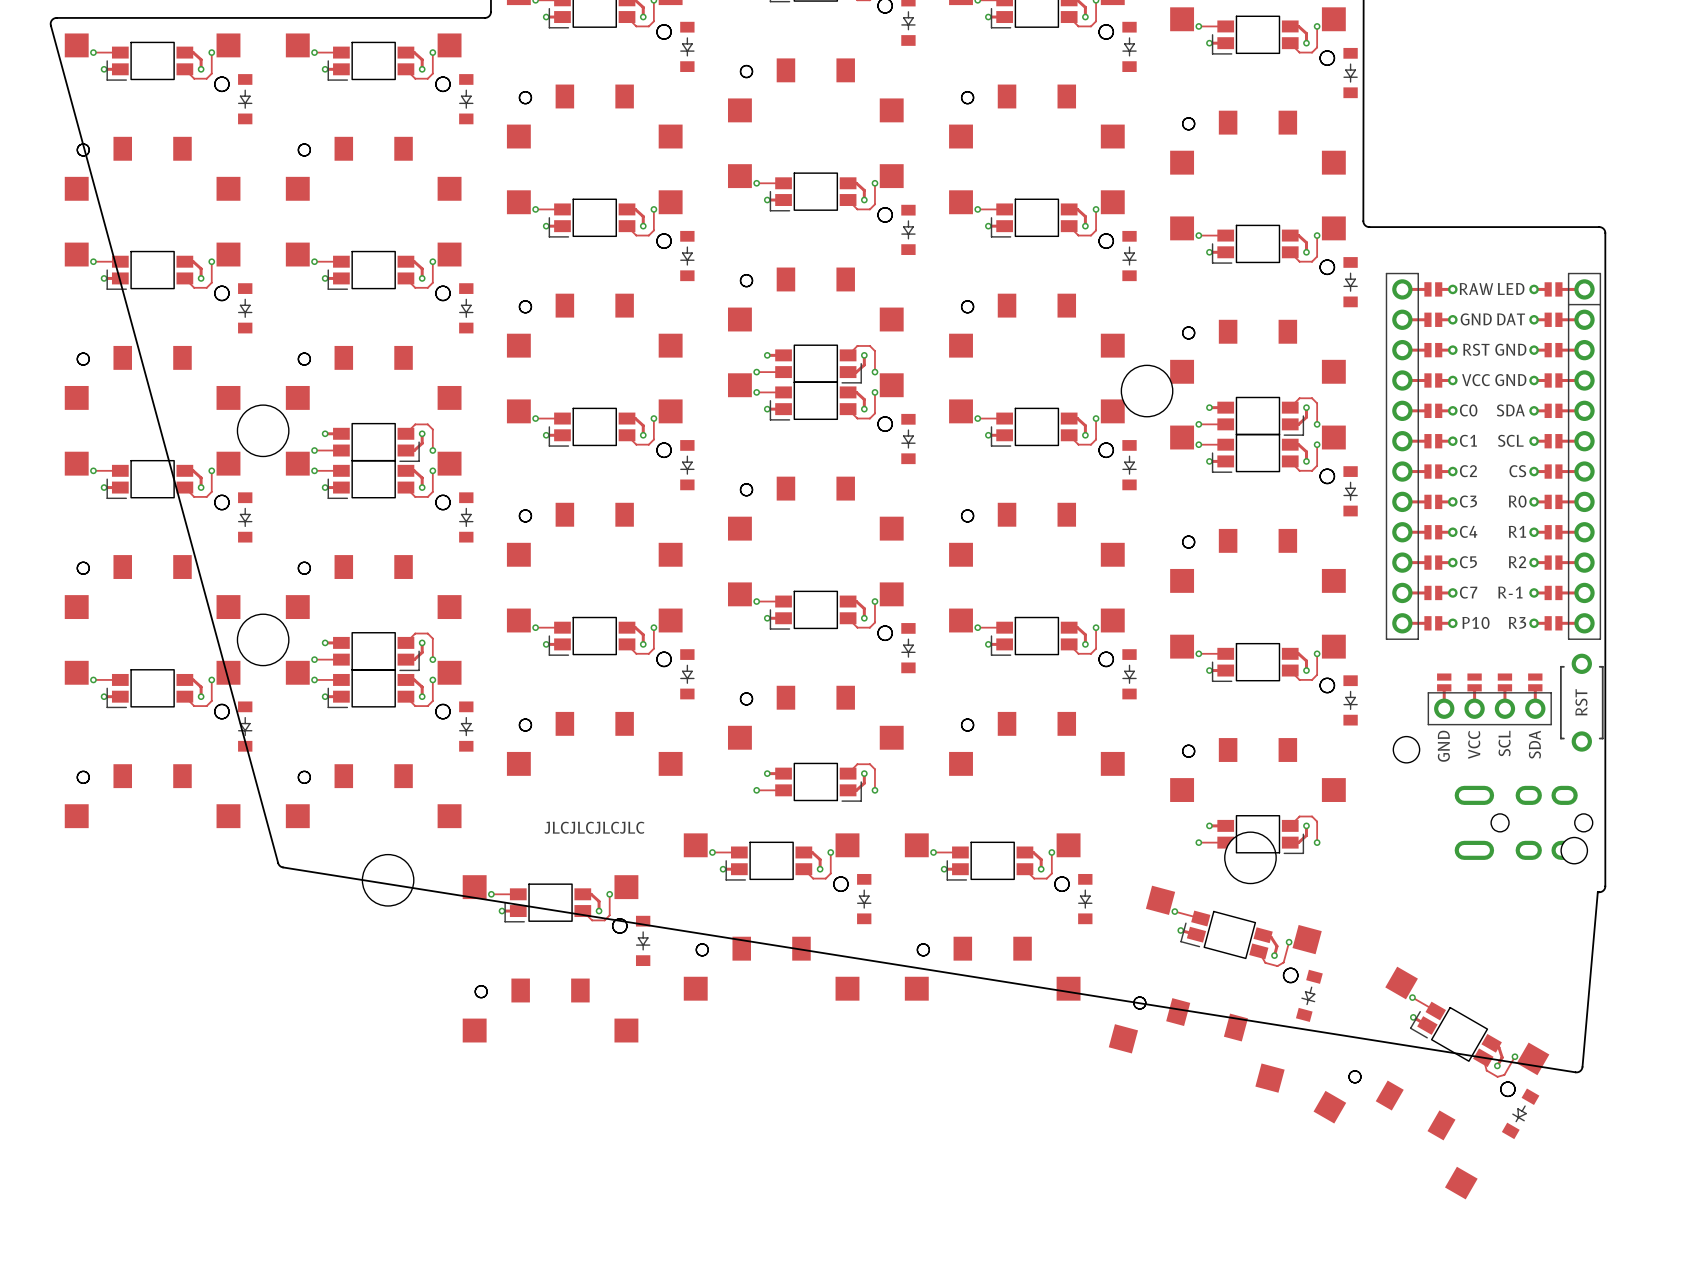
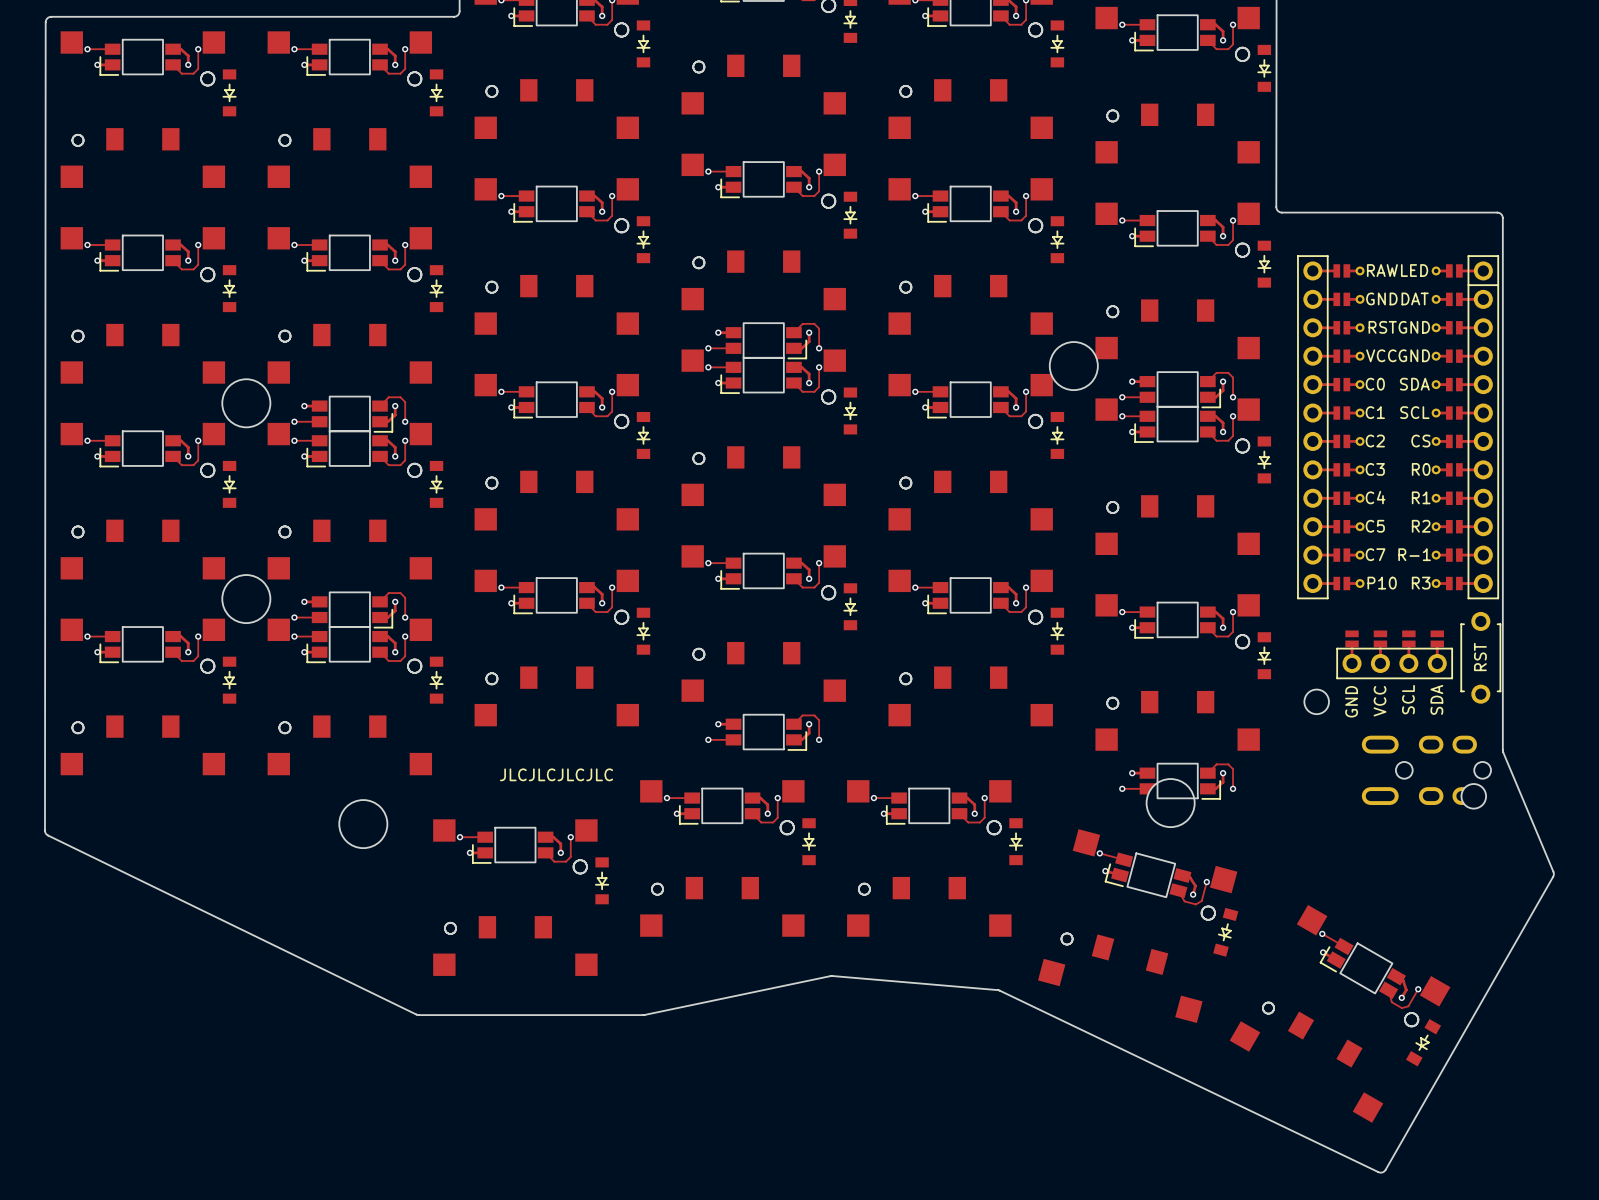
board edge: (56, 17) (51, 20) (50, 25) (278, 863) (281, 866) (1577, 1072) (1582, 1066) (1597, 892) (1602, 891) (1605, 886) (1605, 801) -> (53, 16) (47, 17) (45, 22) (44, 830) (48, 835) (417, 1014) (644, 1015) (831, 975) (998, 990) (1381, 1172) (1385, 1169) (1553, 875) (1502, 750)

